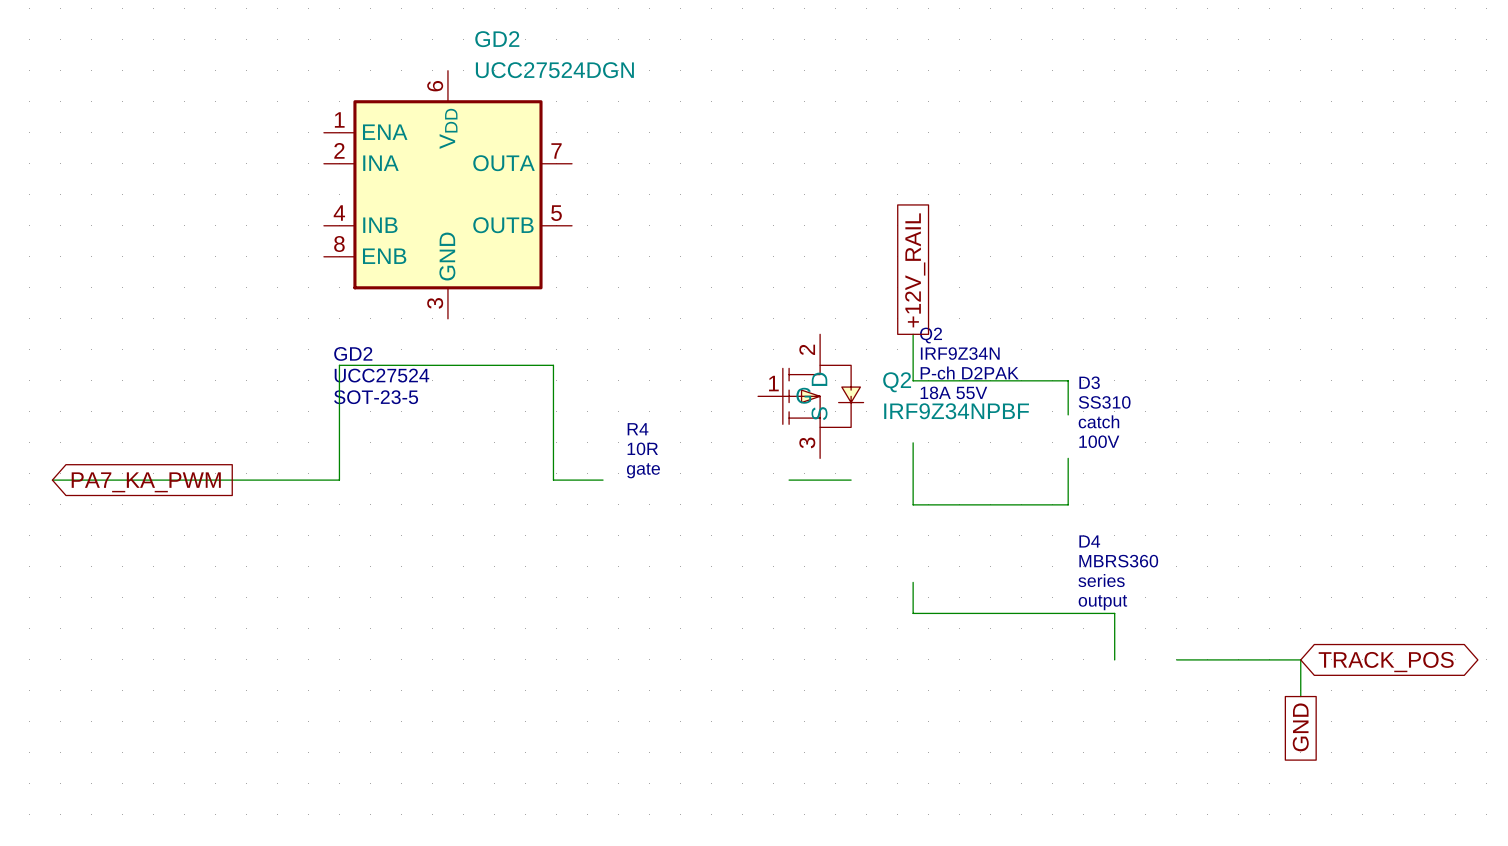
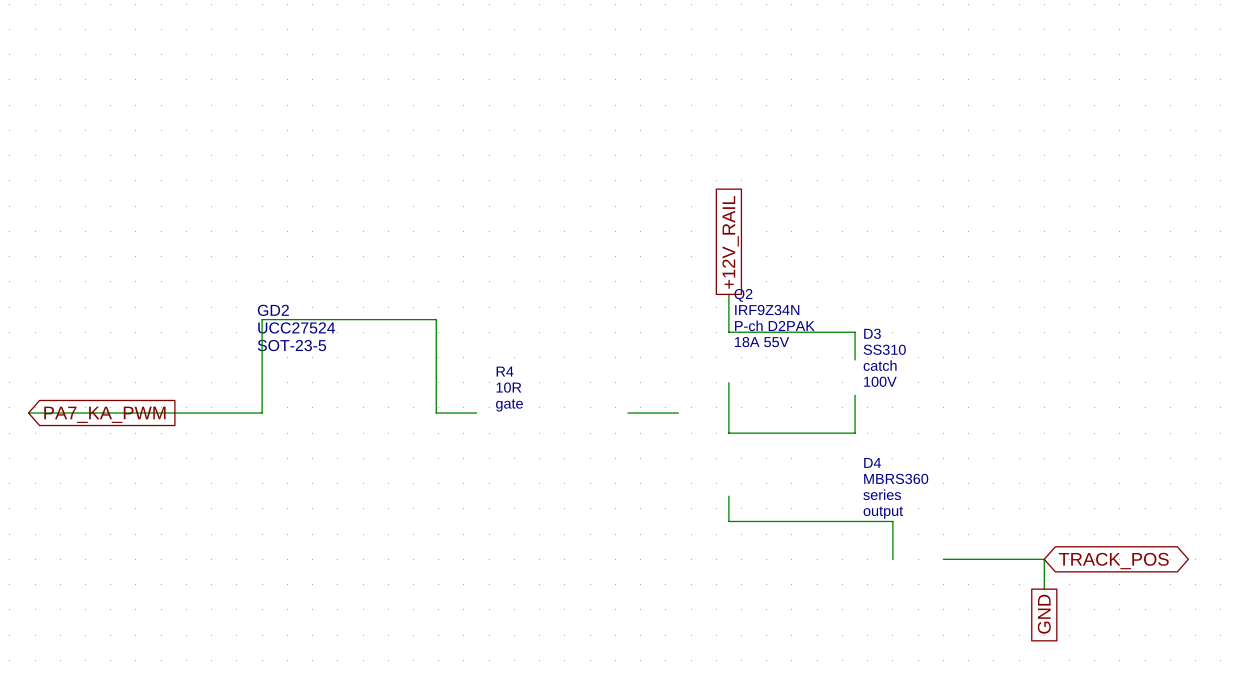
GD2: UCC27524DGN (447, 194) -> none
Q2: IRF9Z34NPBF (810, 396) -> none

